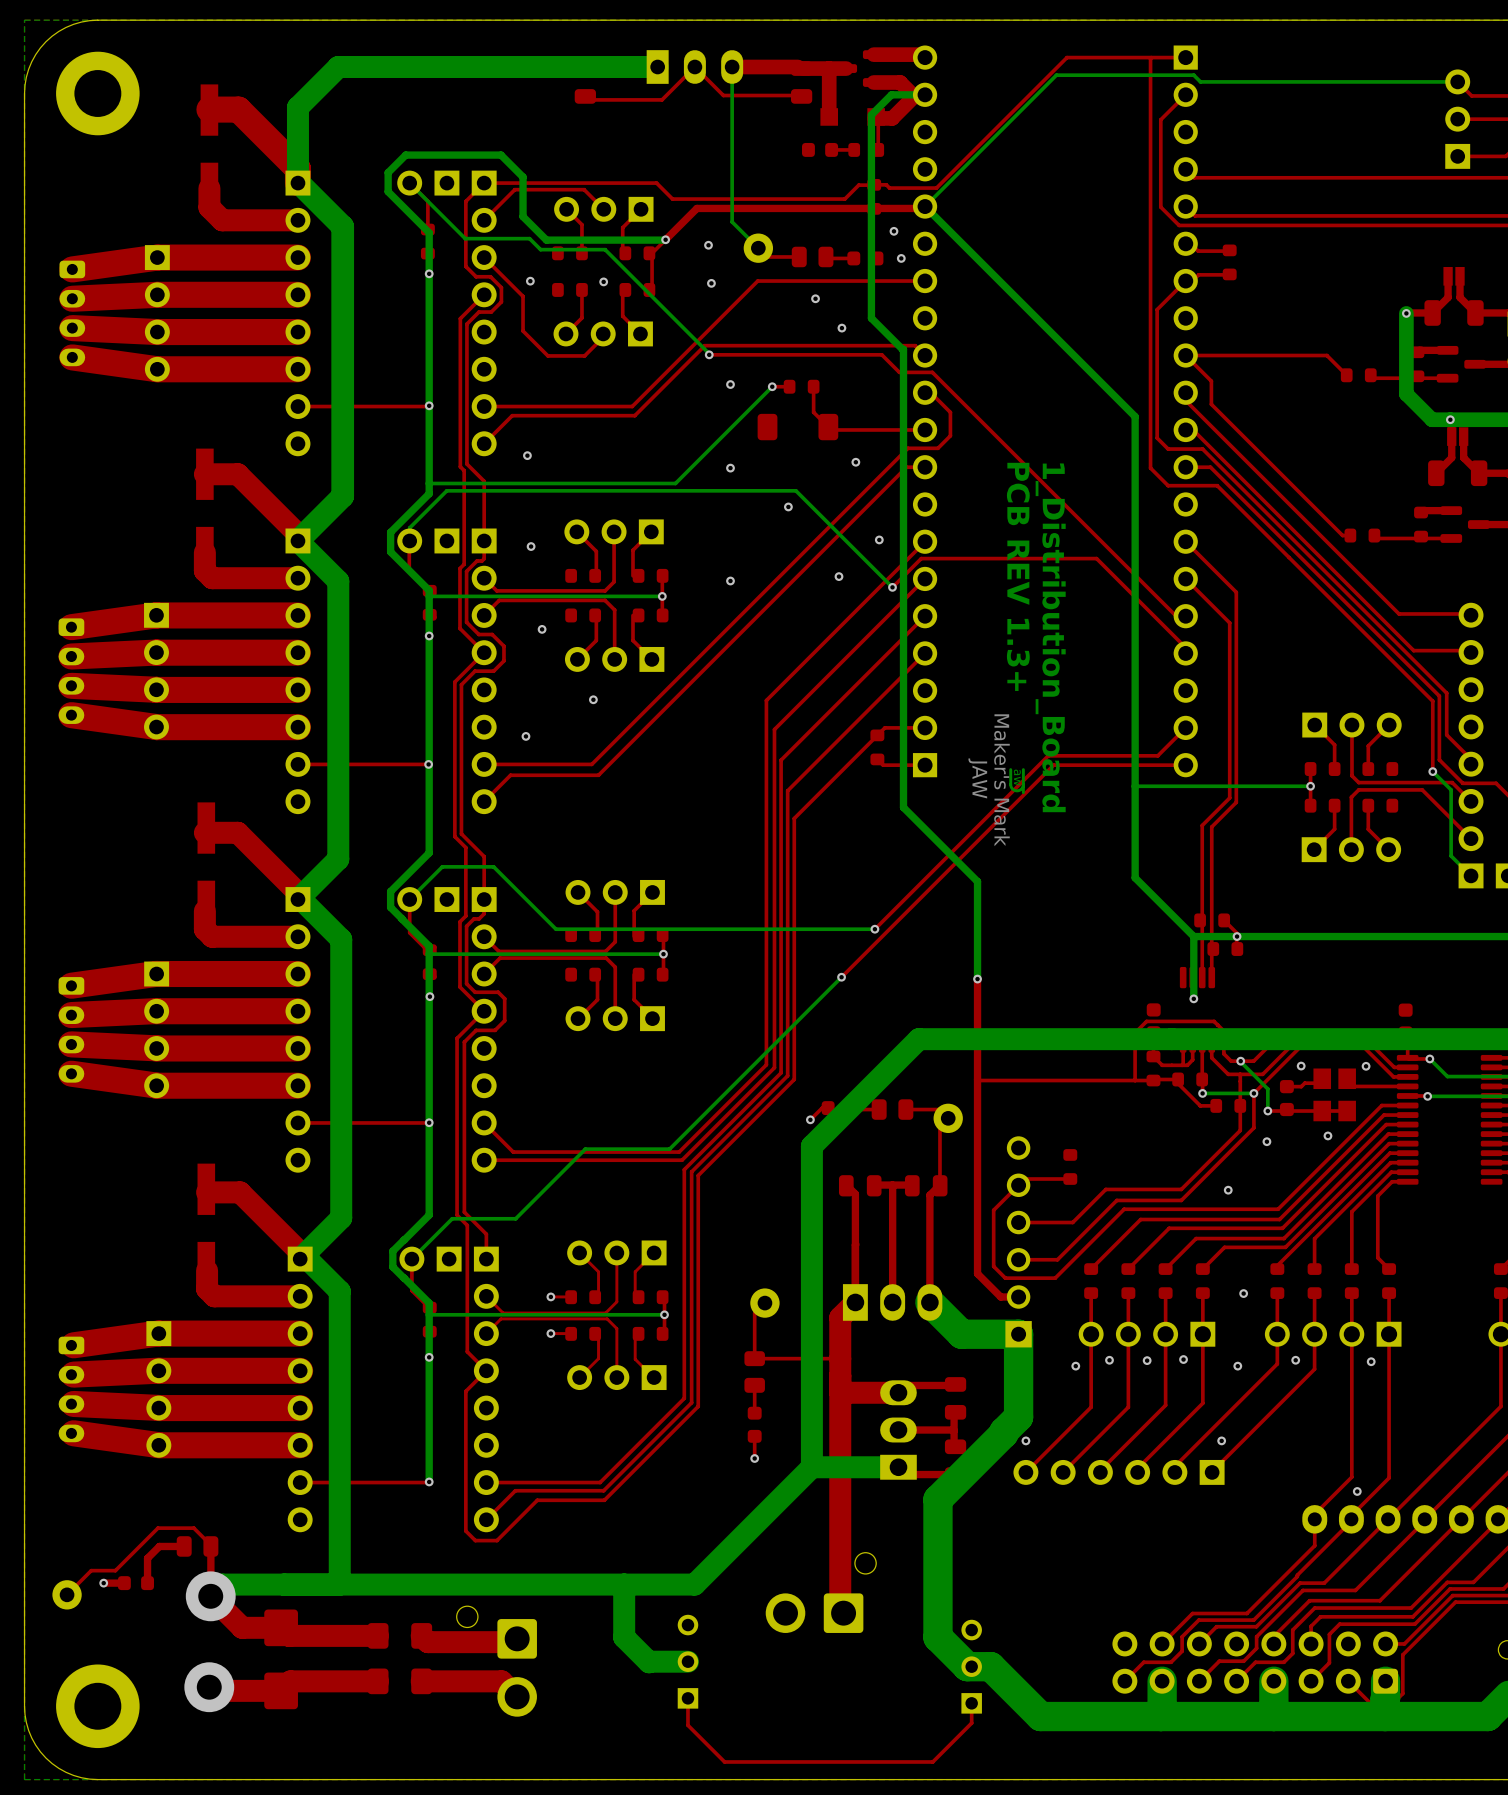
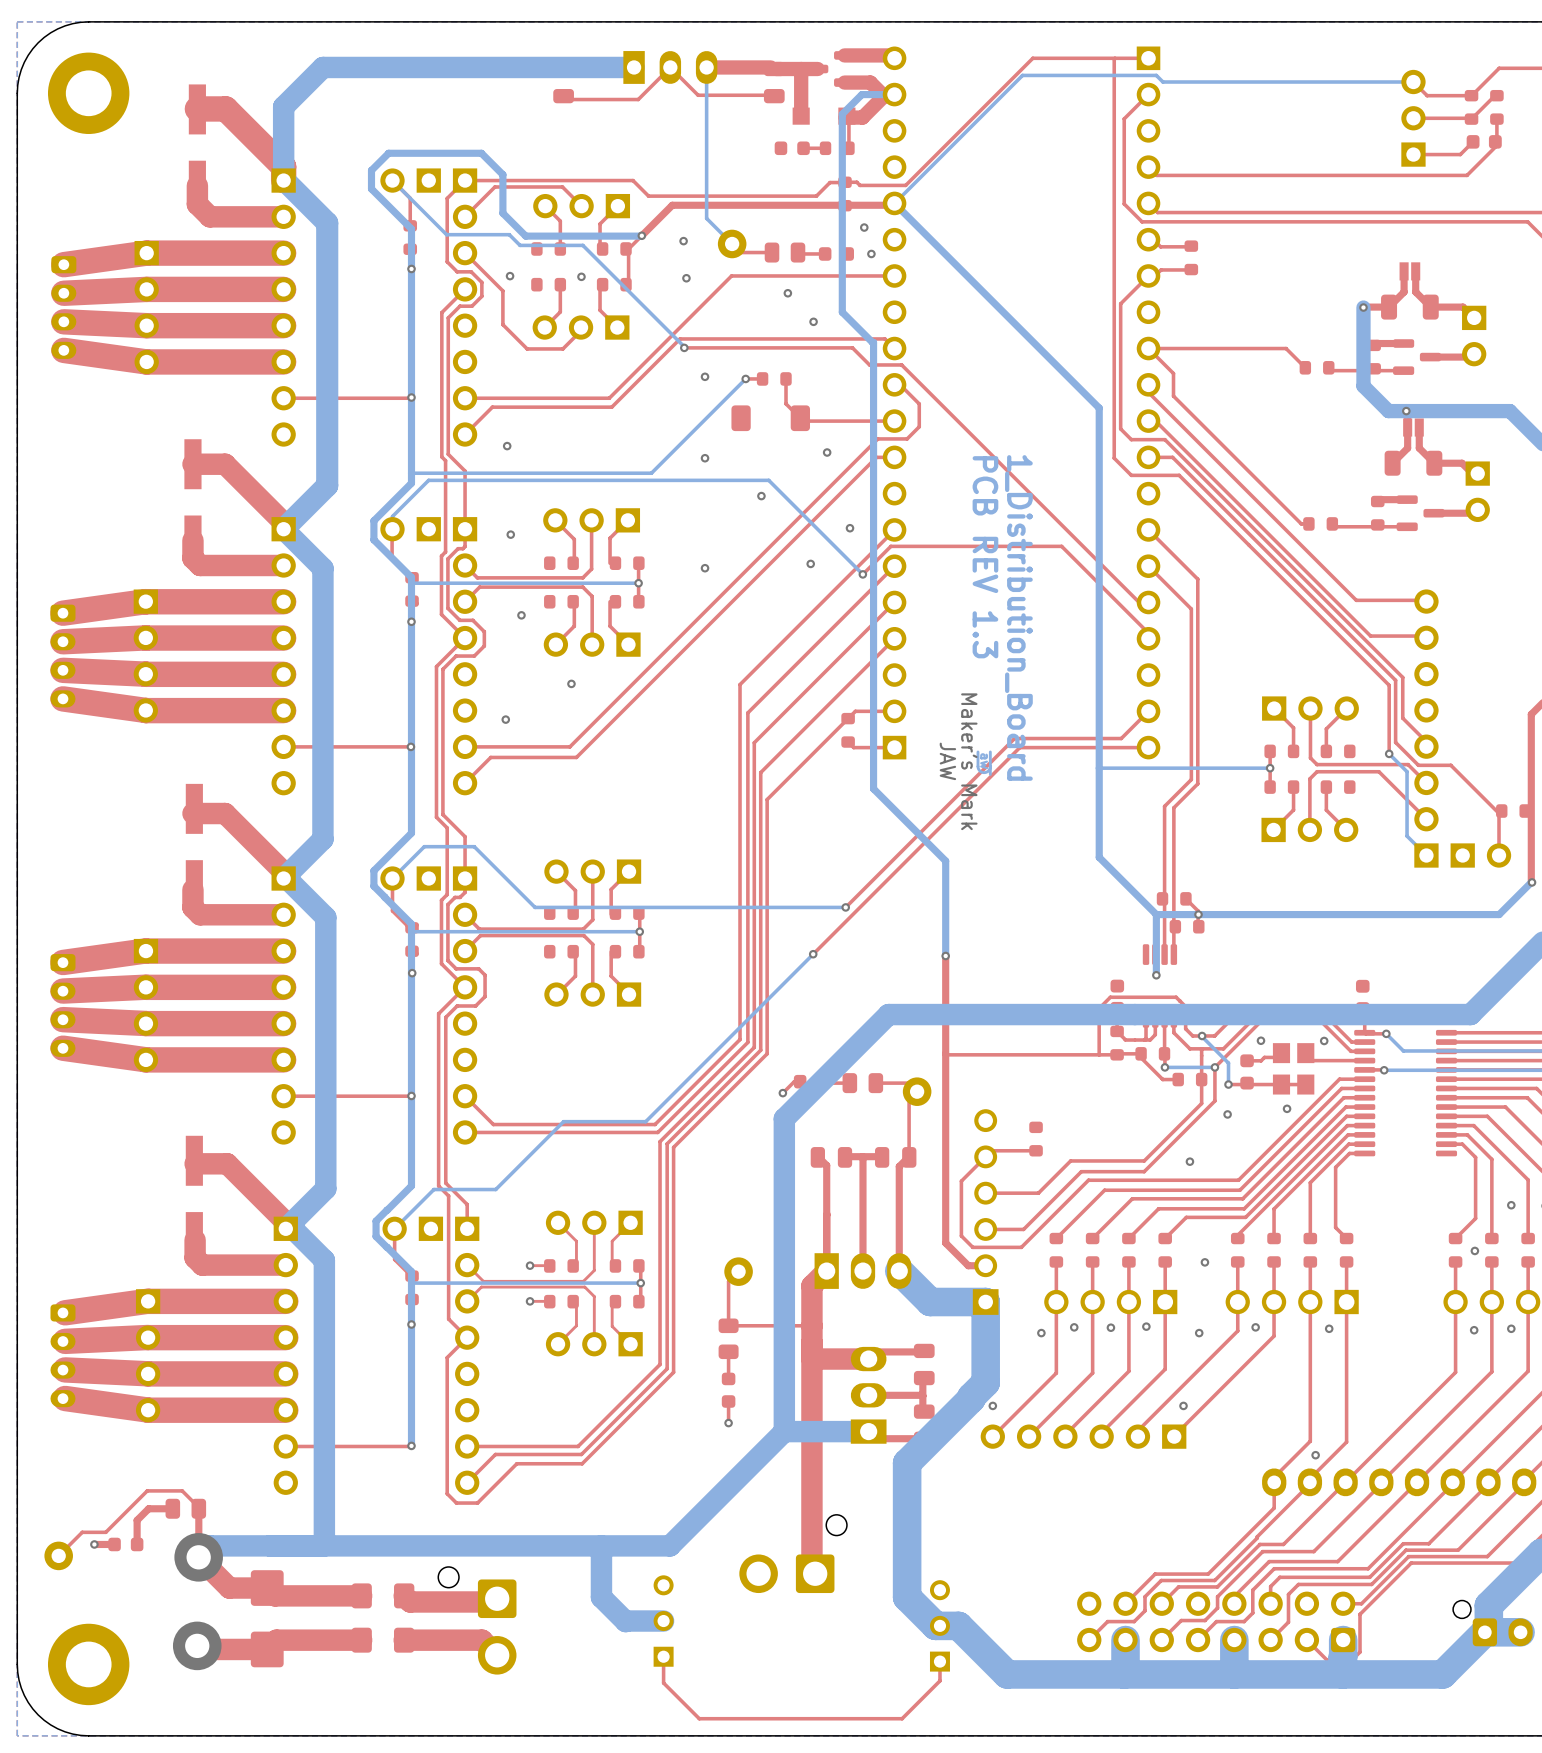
text: PCB REV 1.3+ (1018, 576) -> PCB REV 1.3 (985, 557)

